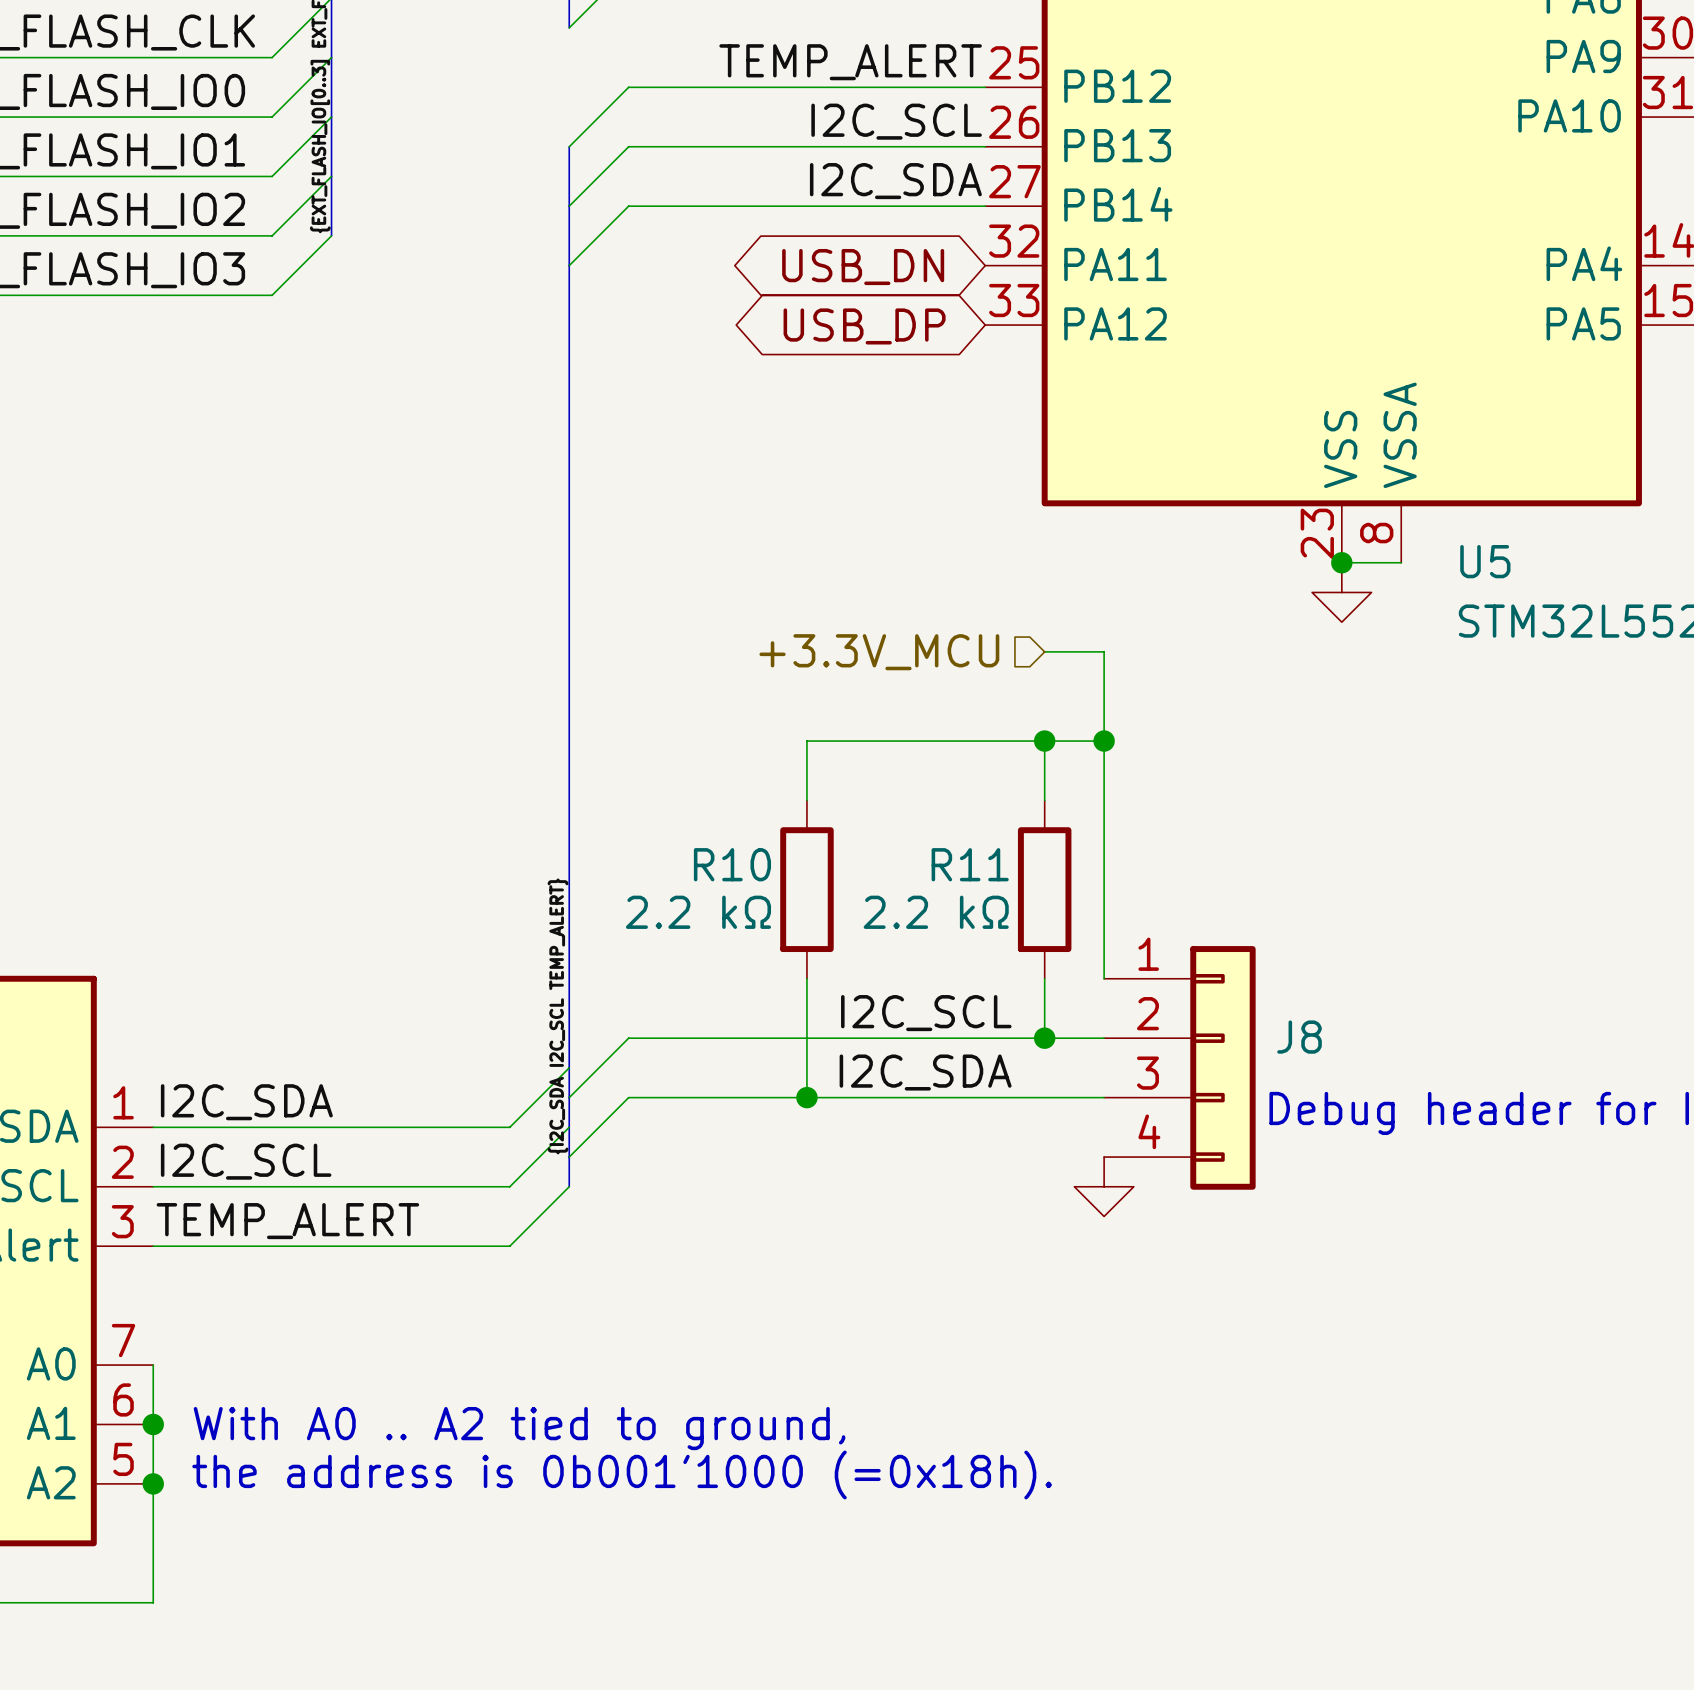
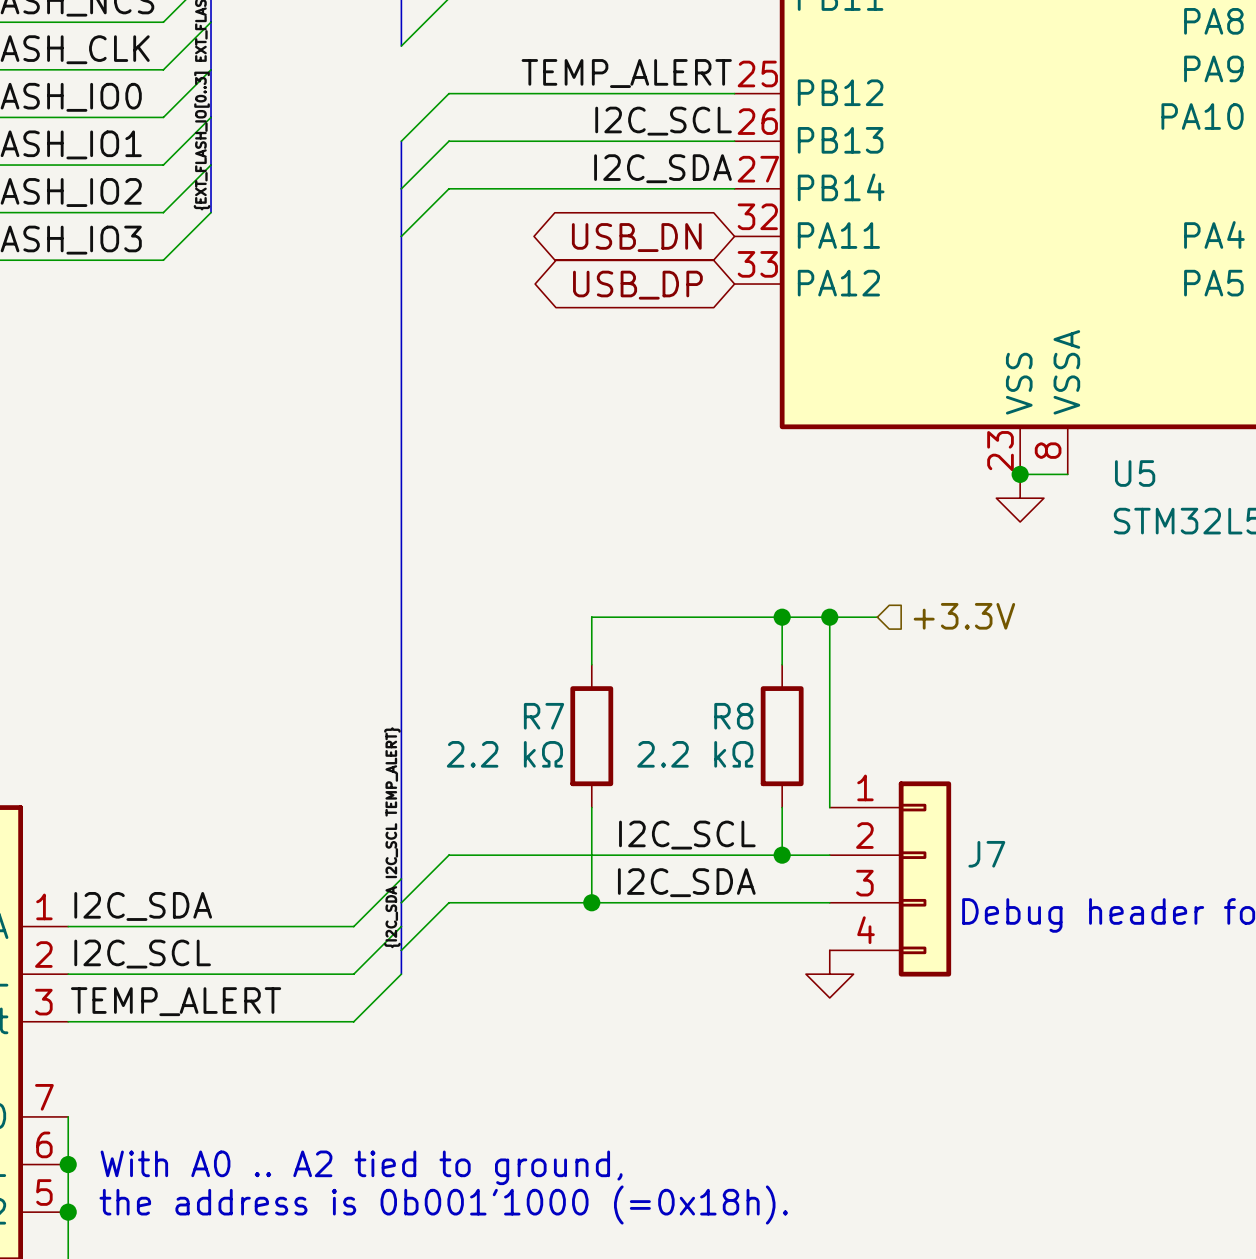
wire: (1044, 651) (1104, 651) (1104, 741) -> (877, 617) (829, 617)
hierarchical label: +3.3V_MCU (879, 652) -> none
hierarchical label: none -> +3.3V (964, 616)
R10 name: R10 (732, 864) -> R7 (544, 716)
R11 name: R11 (970, 864) -> R8 (733, 716)
J8 name: J8 (1299, 1037) -> J7 (986, 854)

